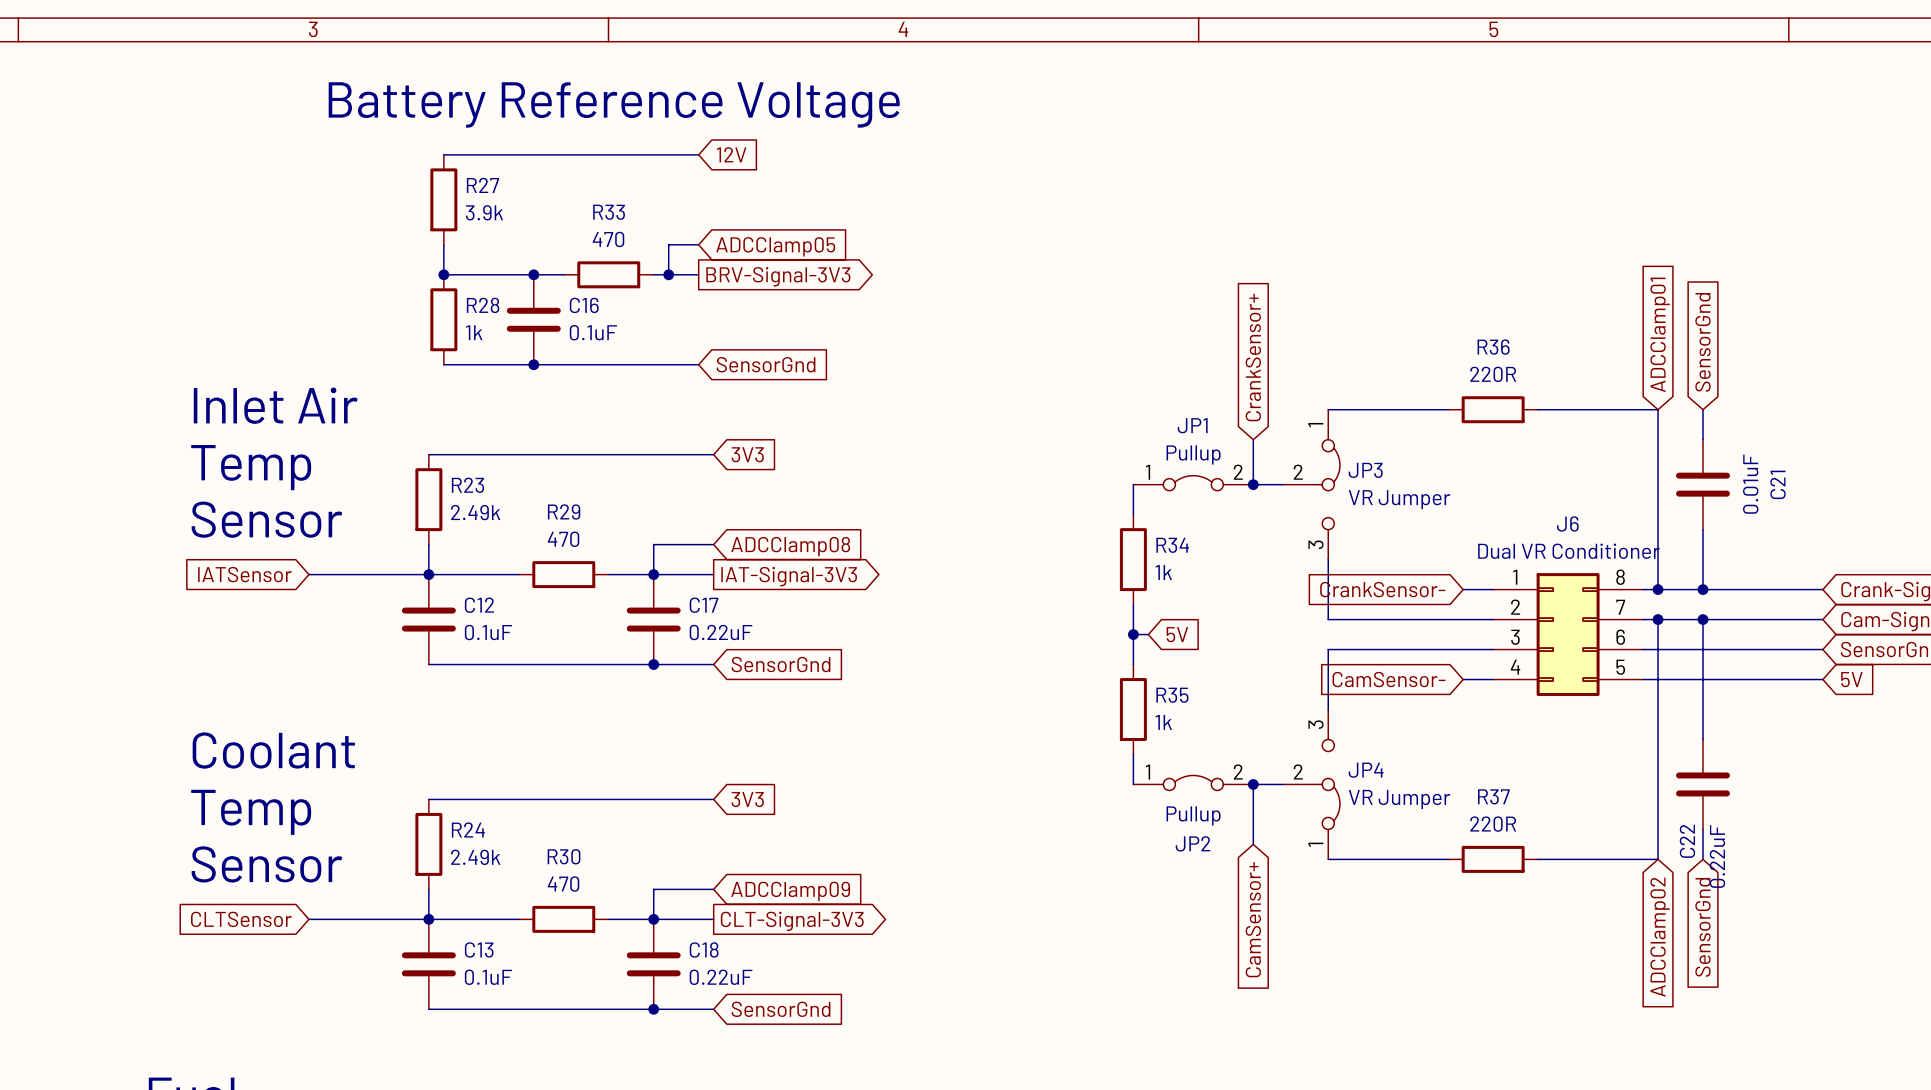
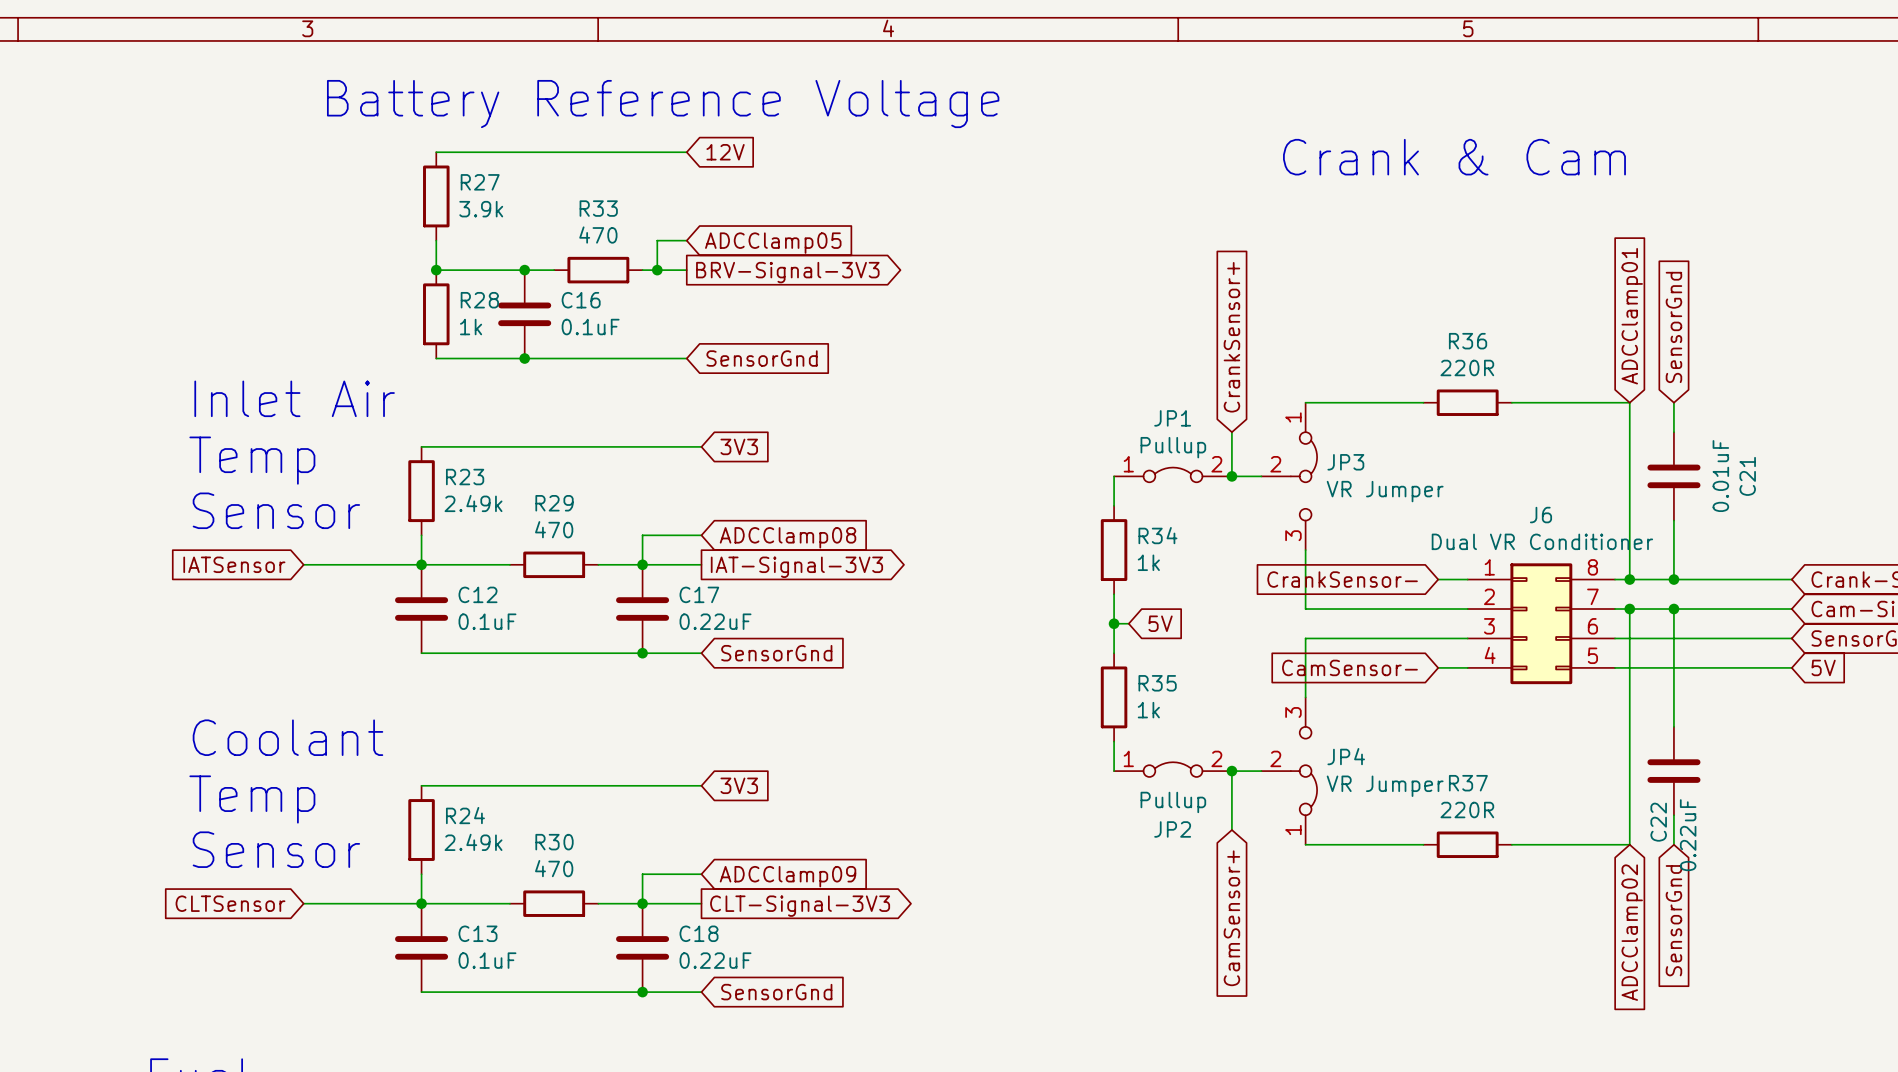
text: none -> Crank & Cam (1454, 157)

